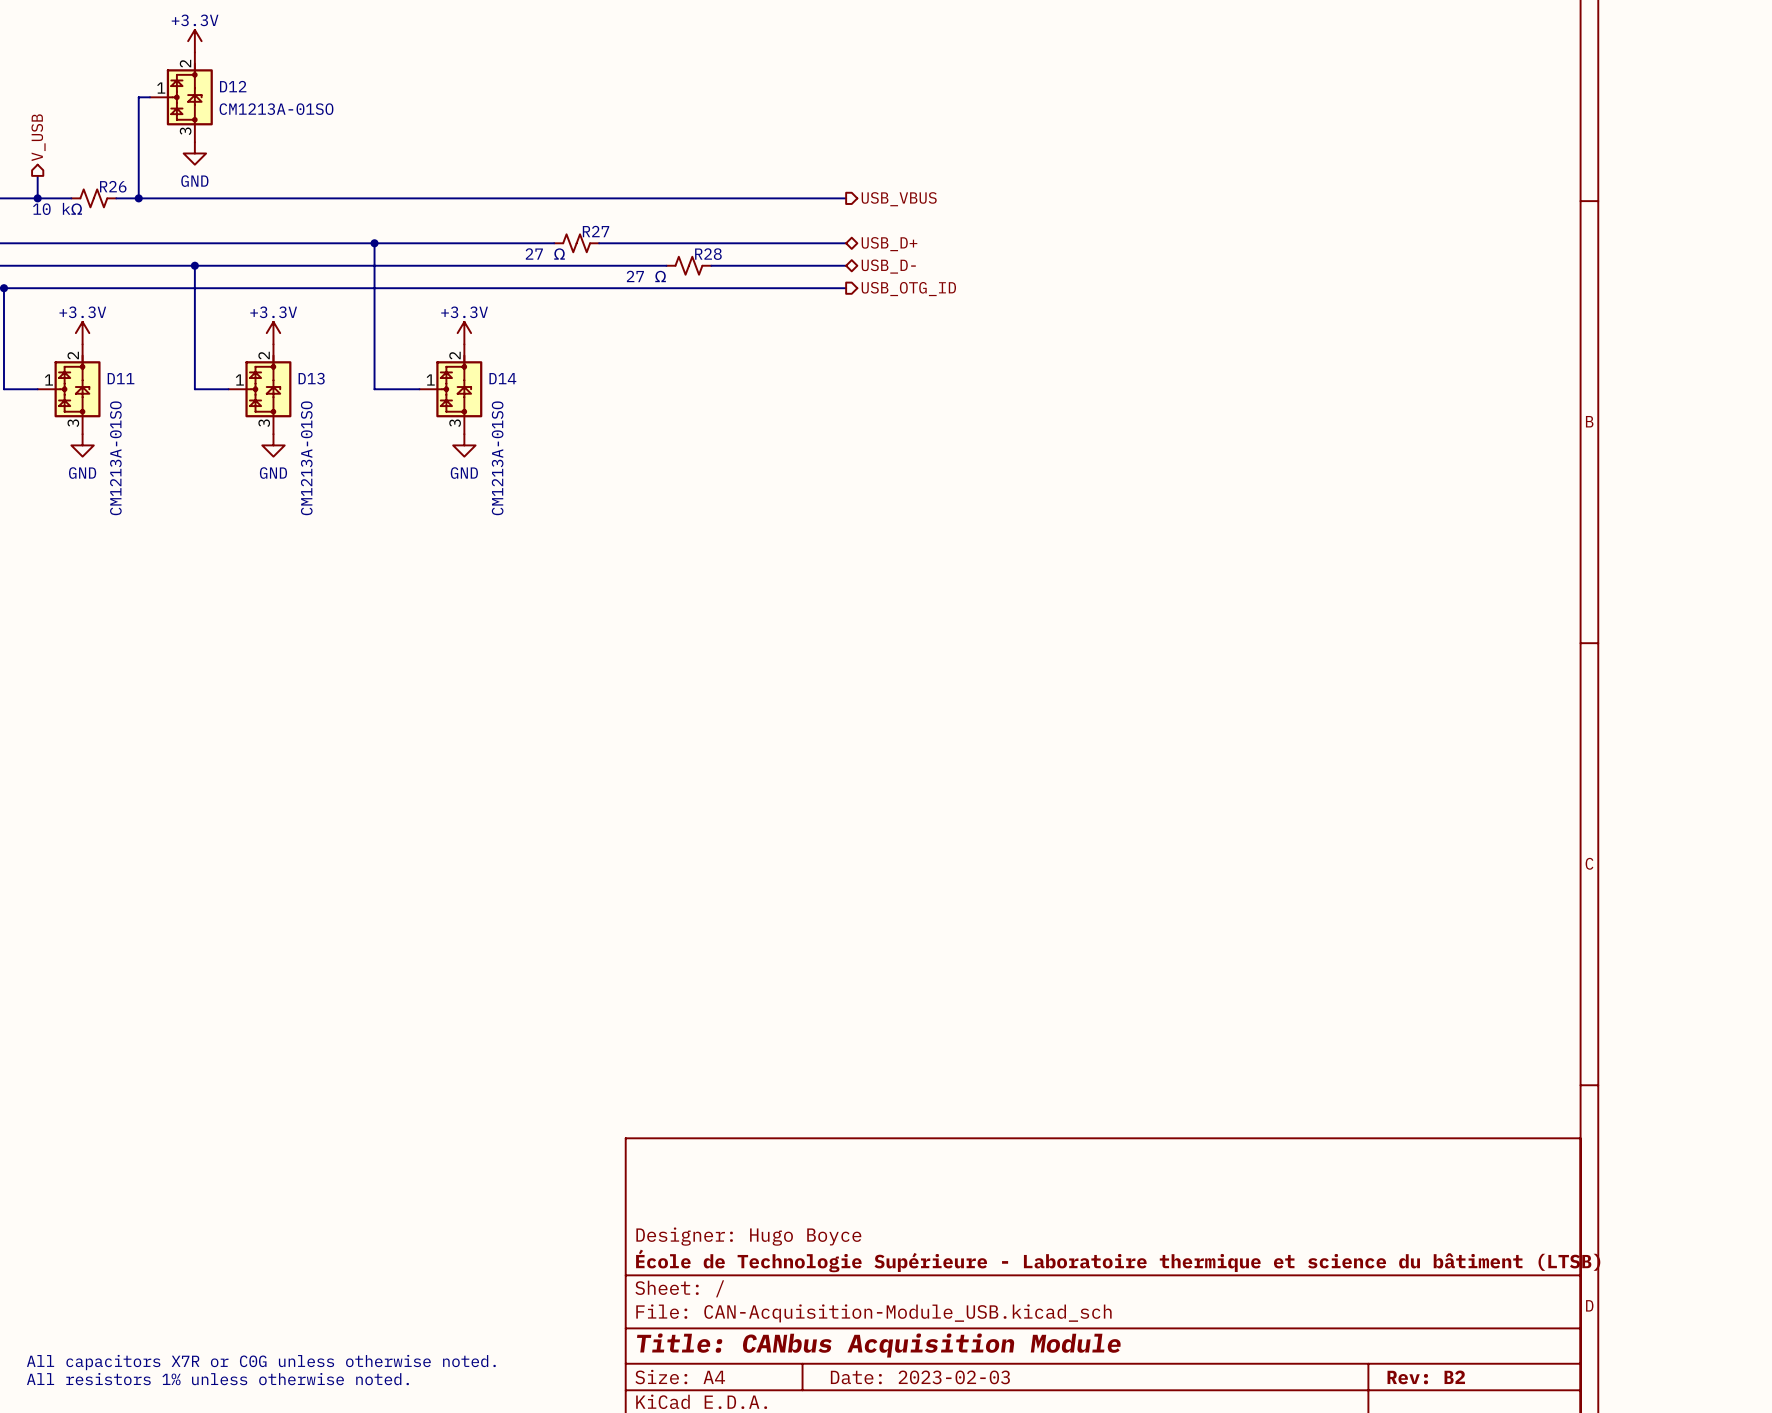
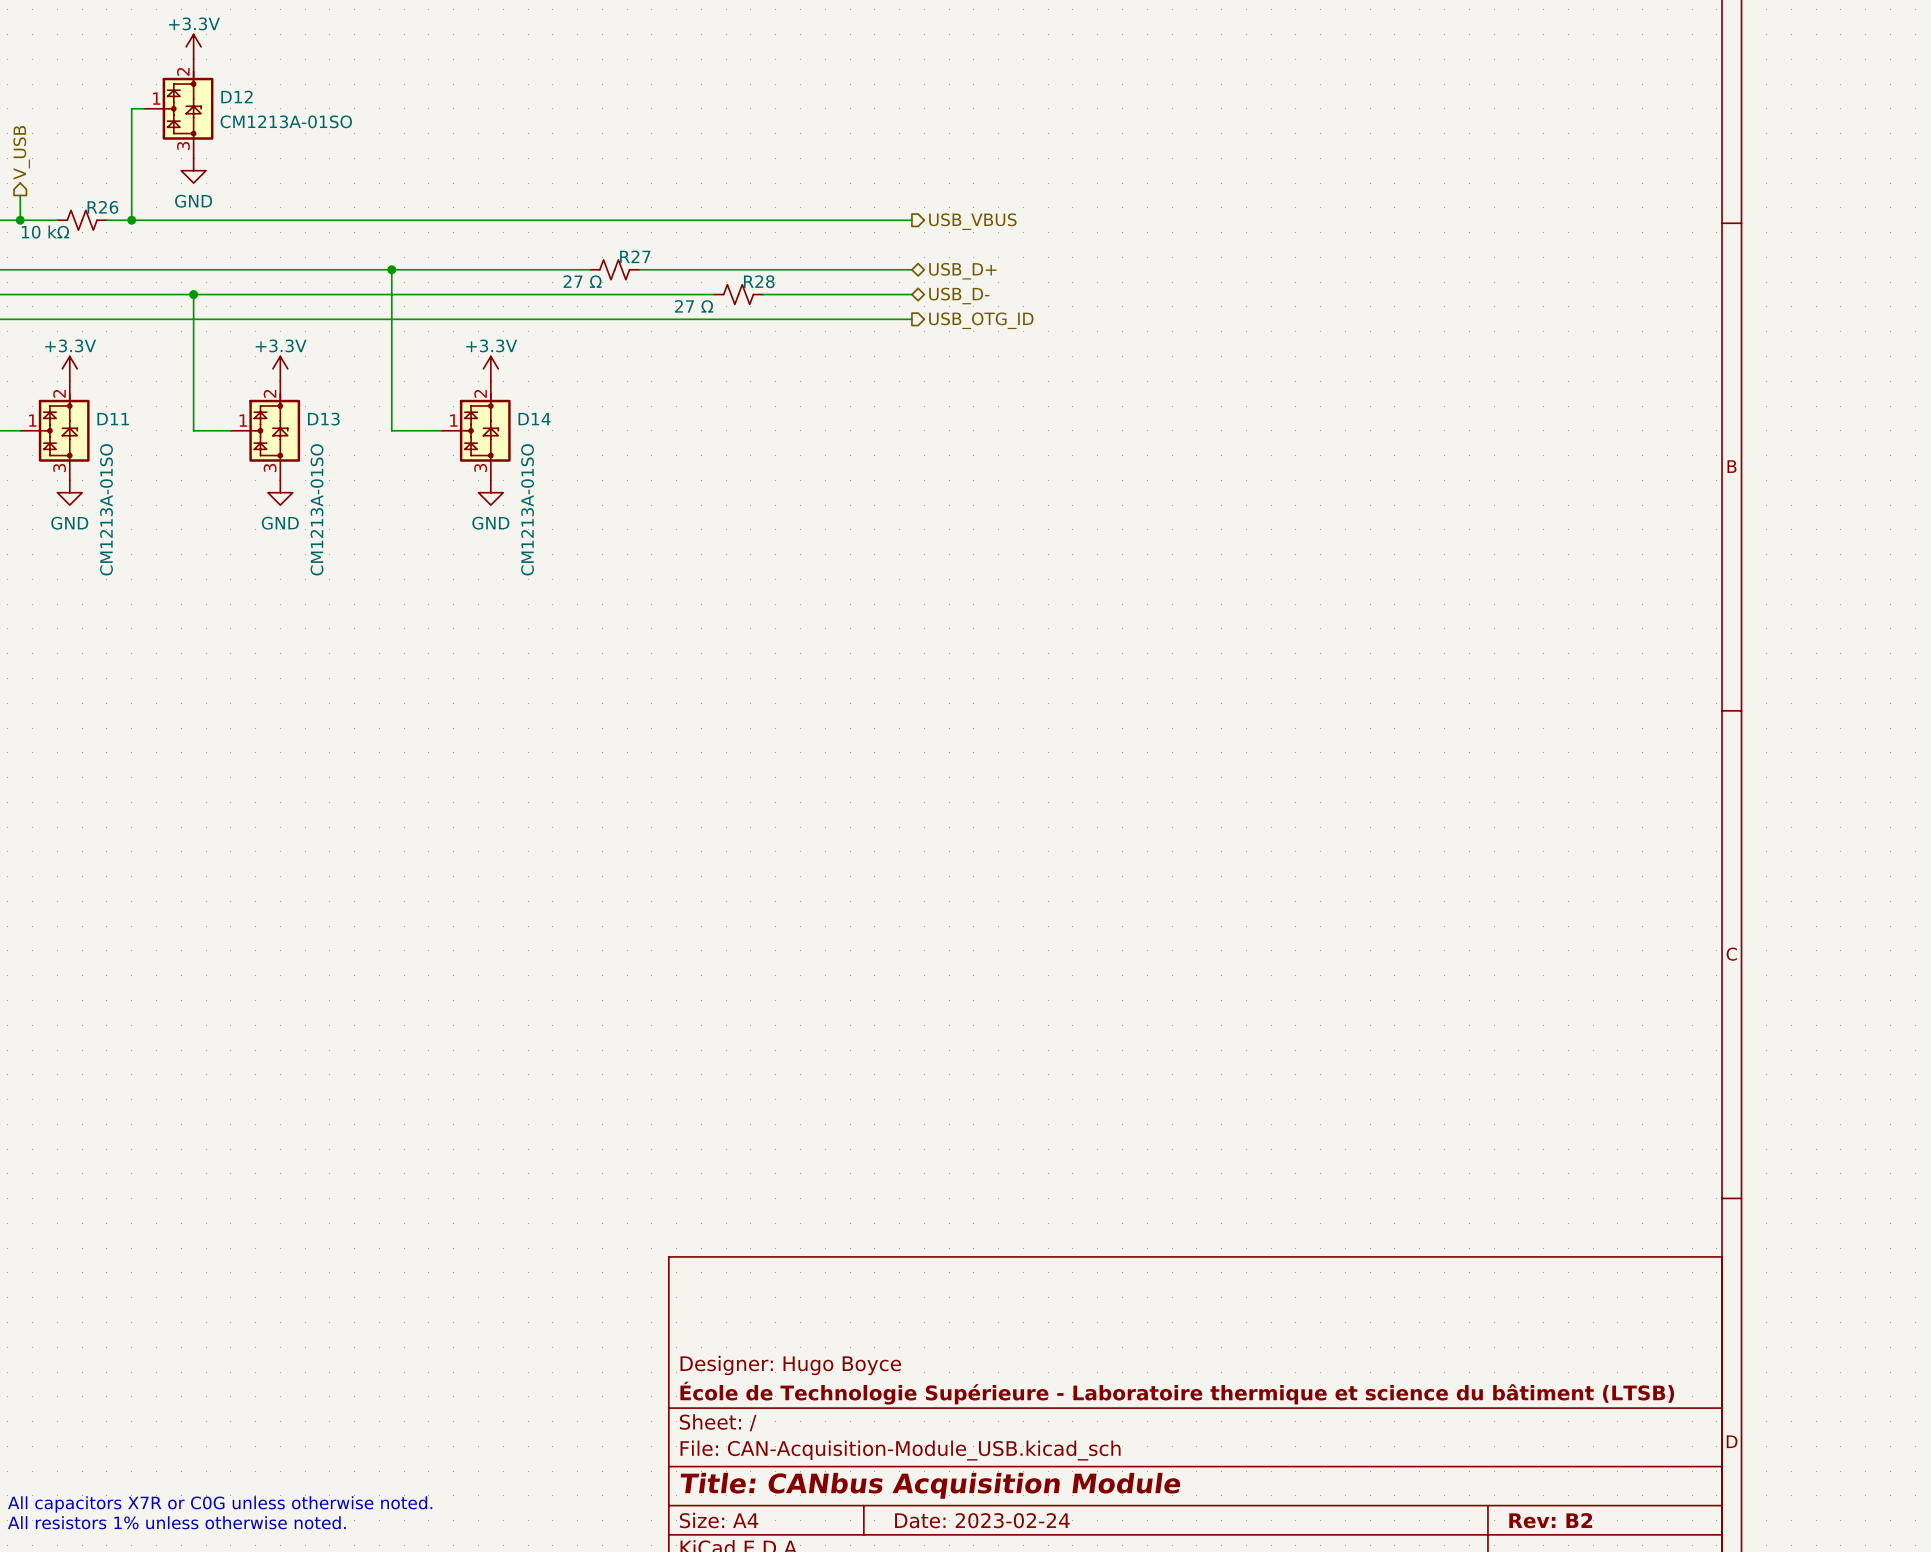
title block: Date: 2023-02-03 (920, 1377) -> Date: 2023-02-24 (982, 1520)

